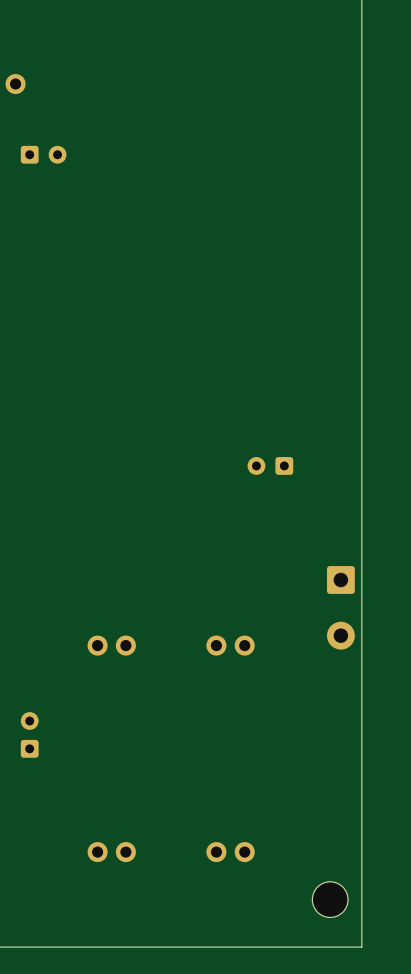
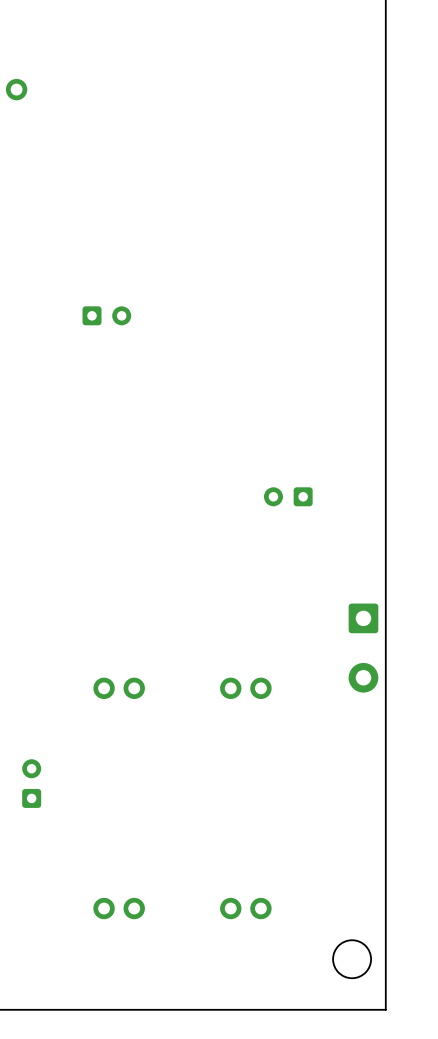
part position: (43, 154) -> (106, 315)

